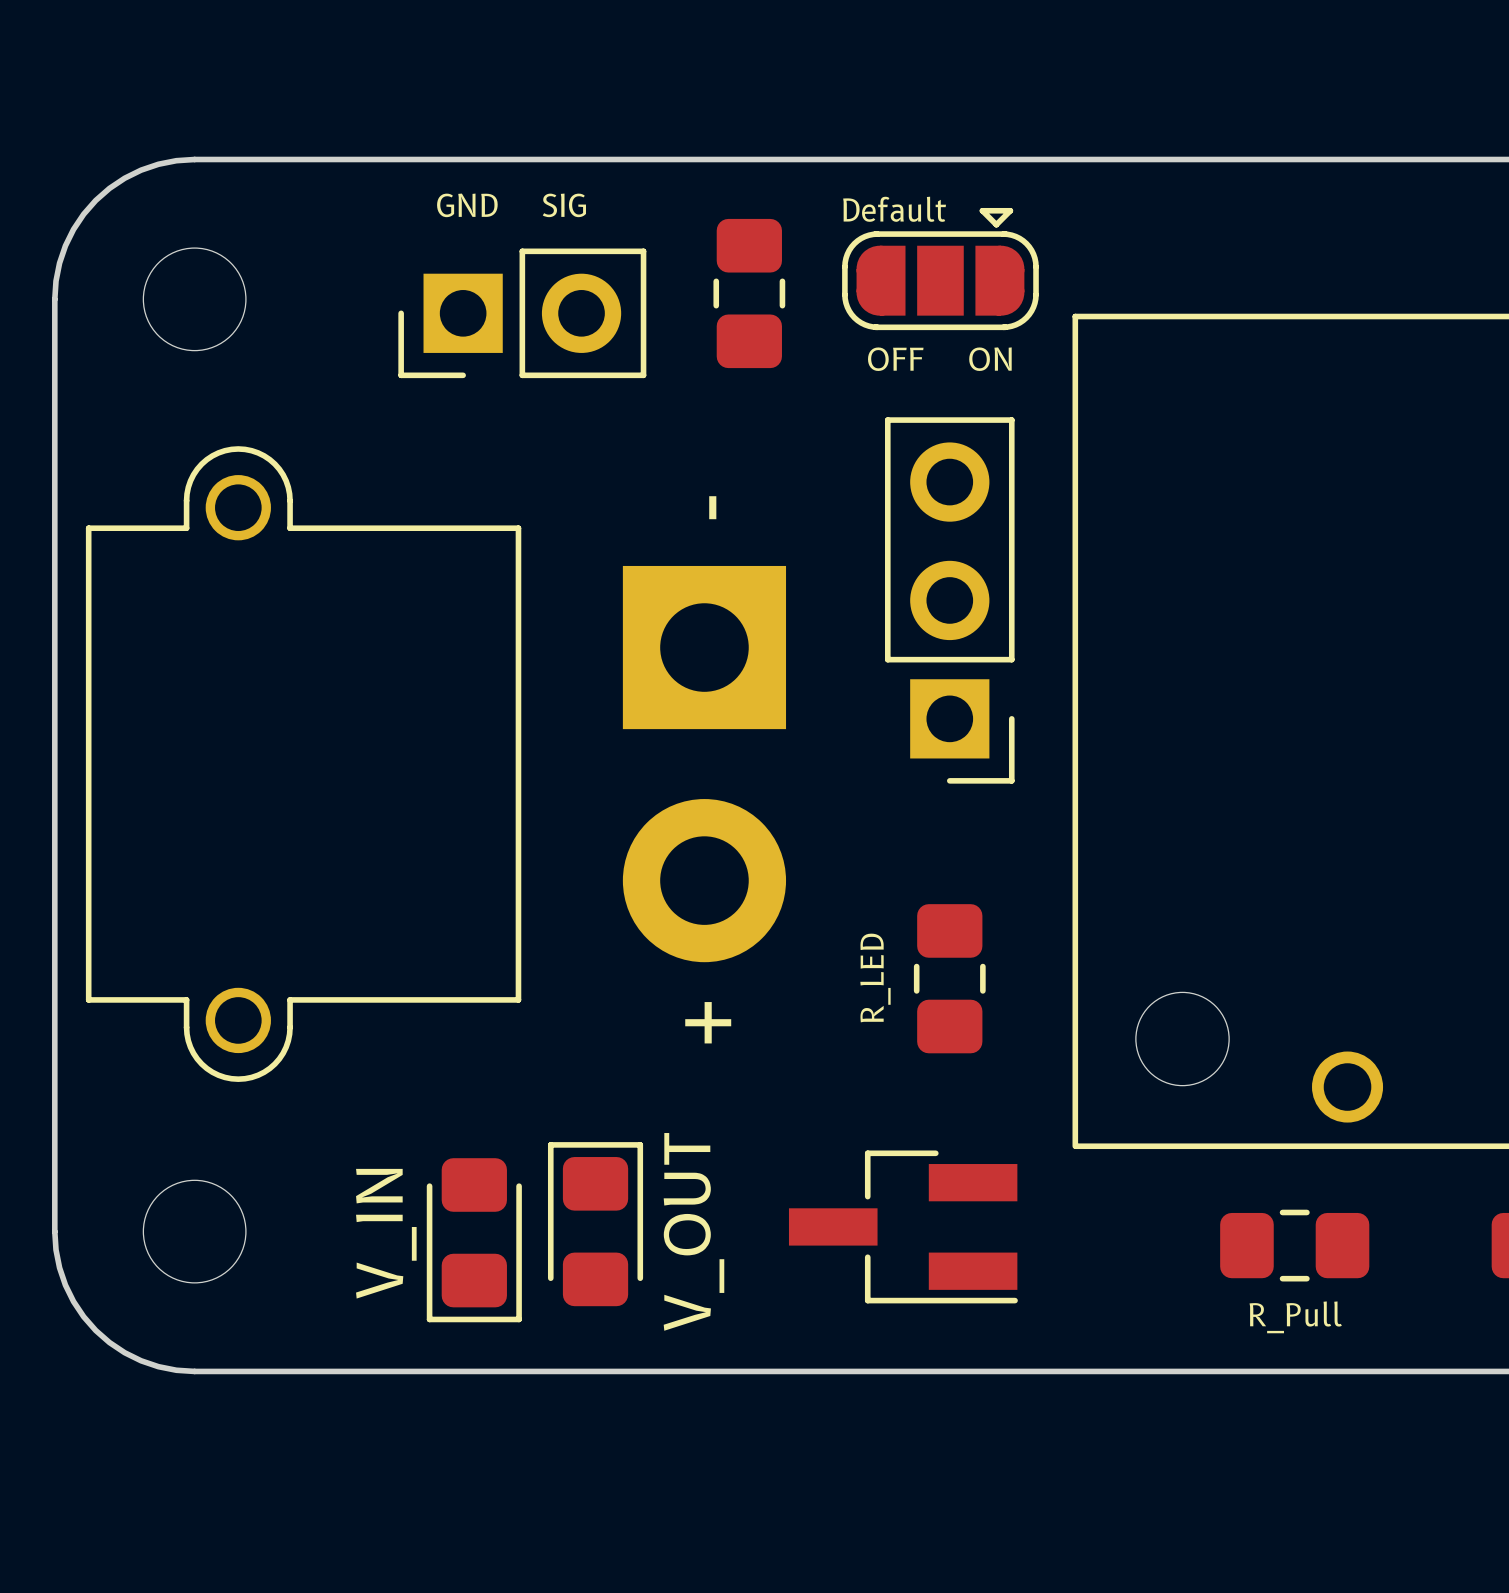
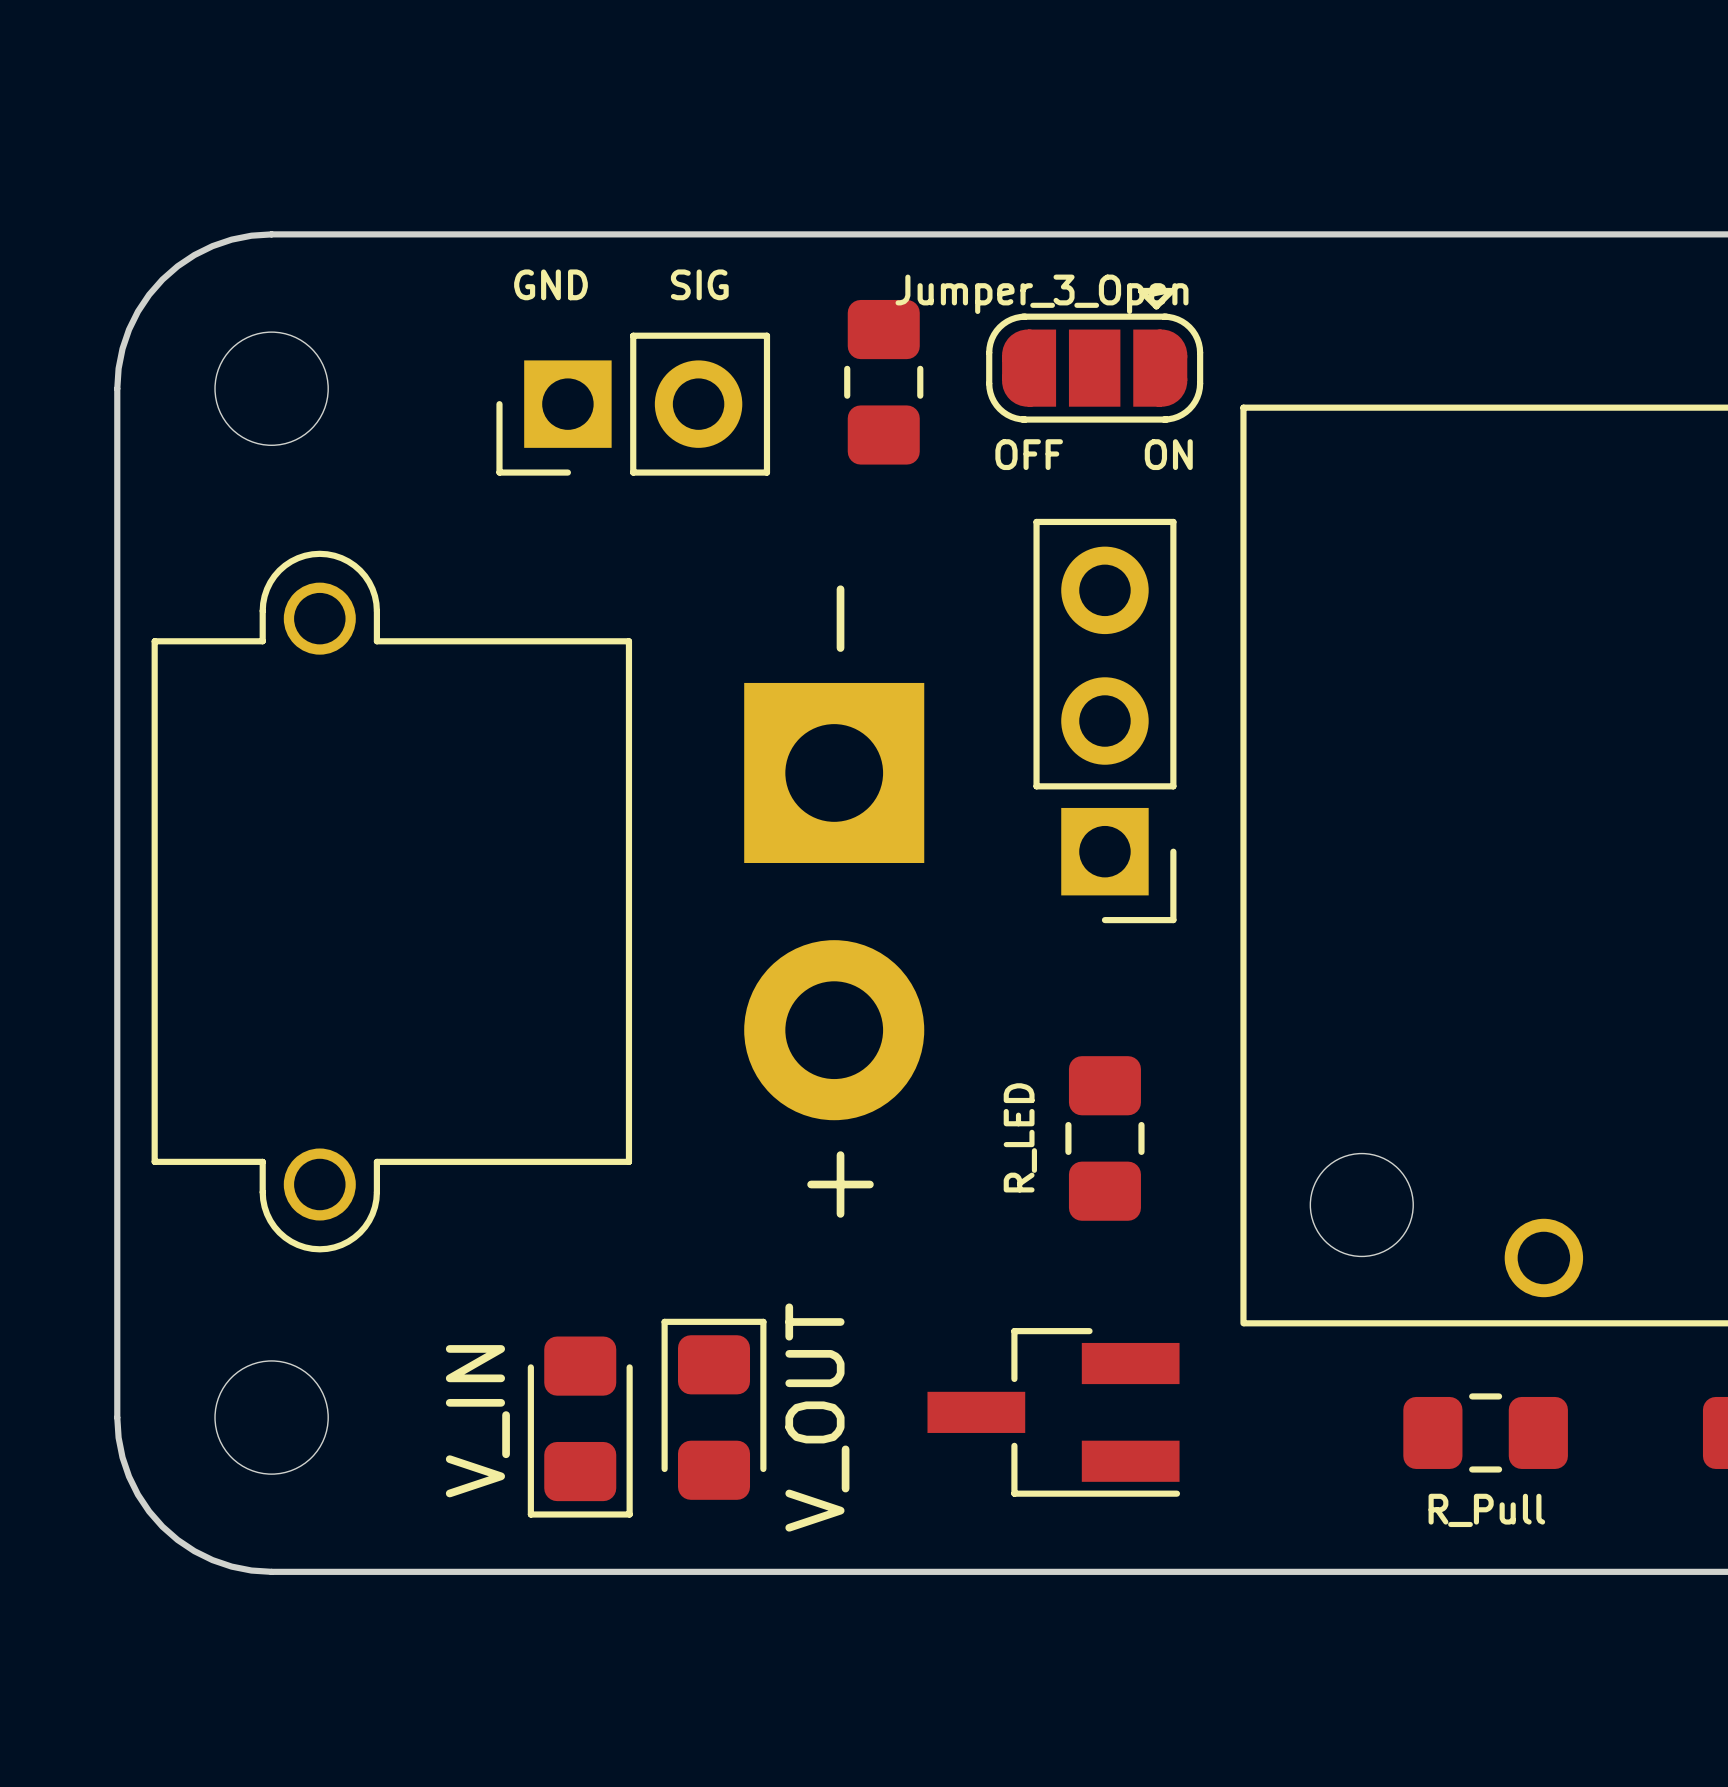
part value: Default (894, 209) -> Jumper_3_Open (1042, 294)

